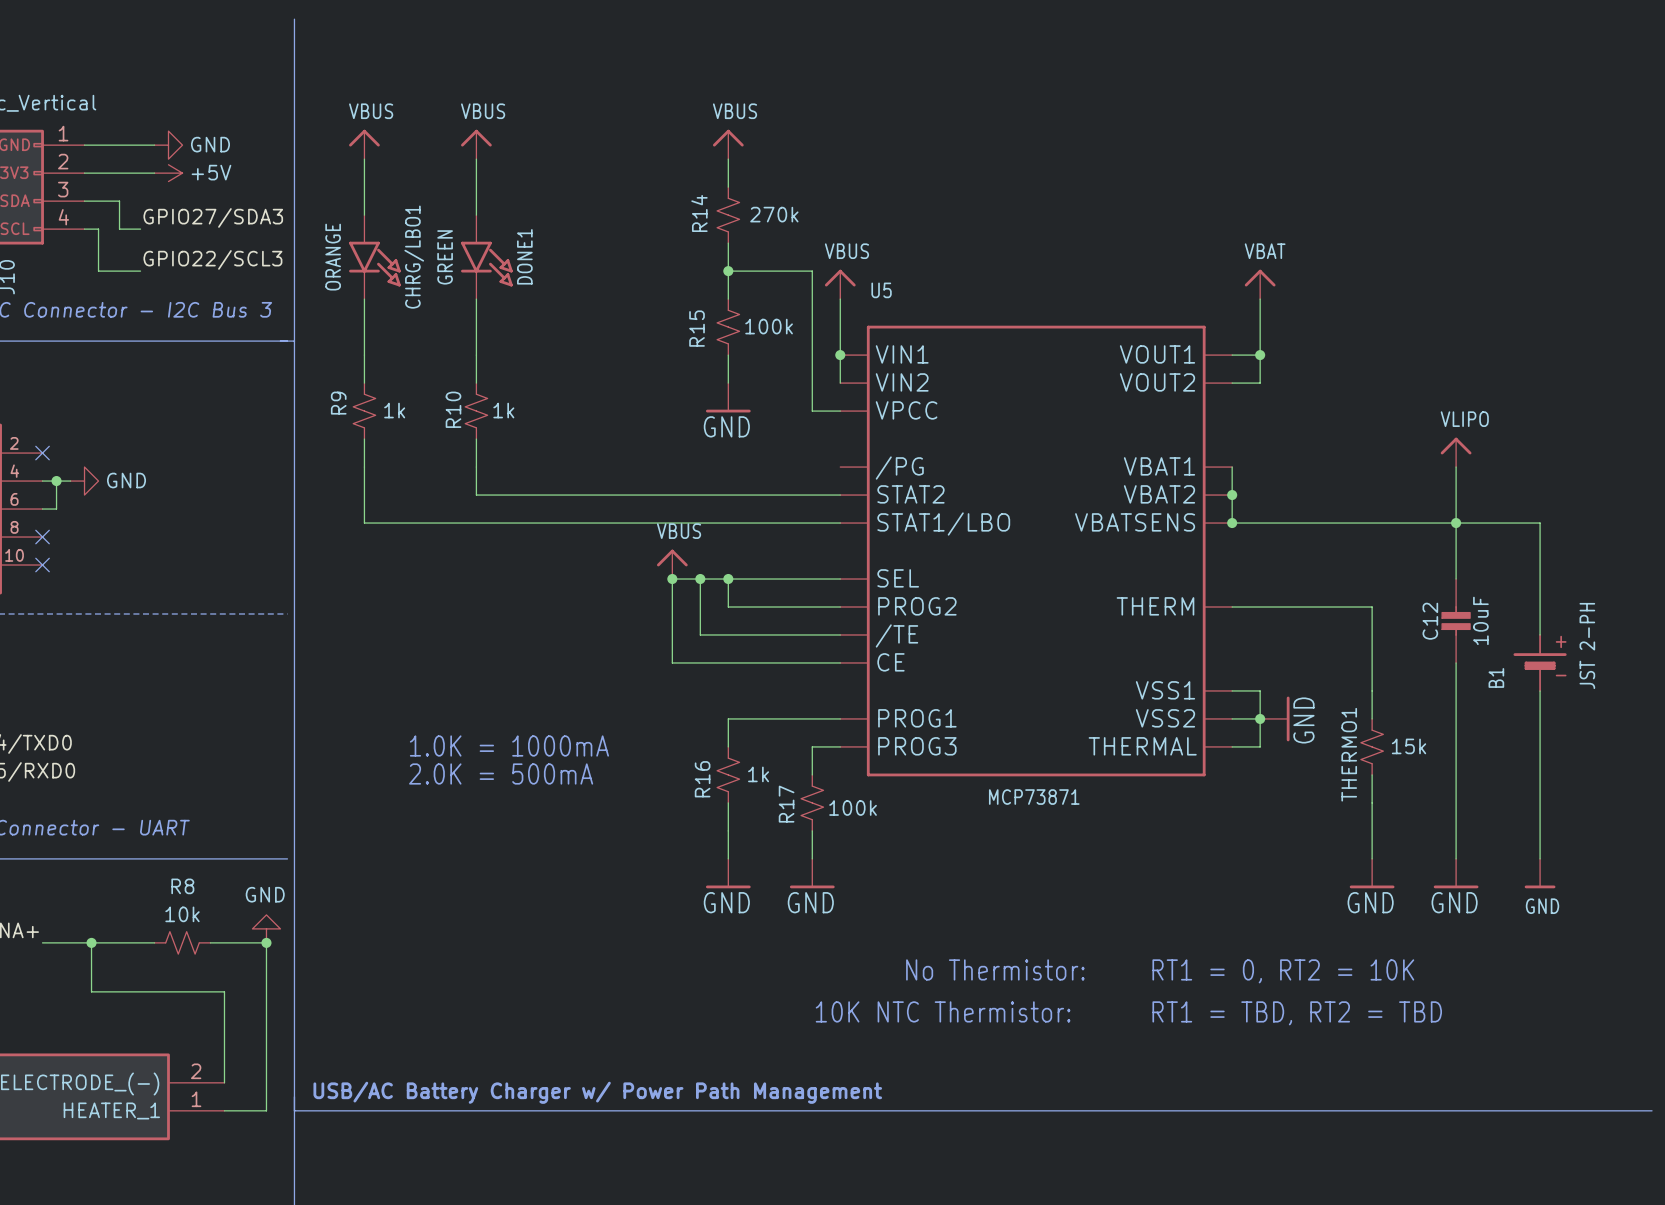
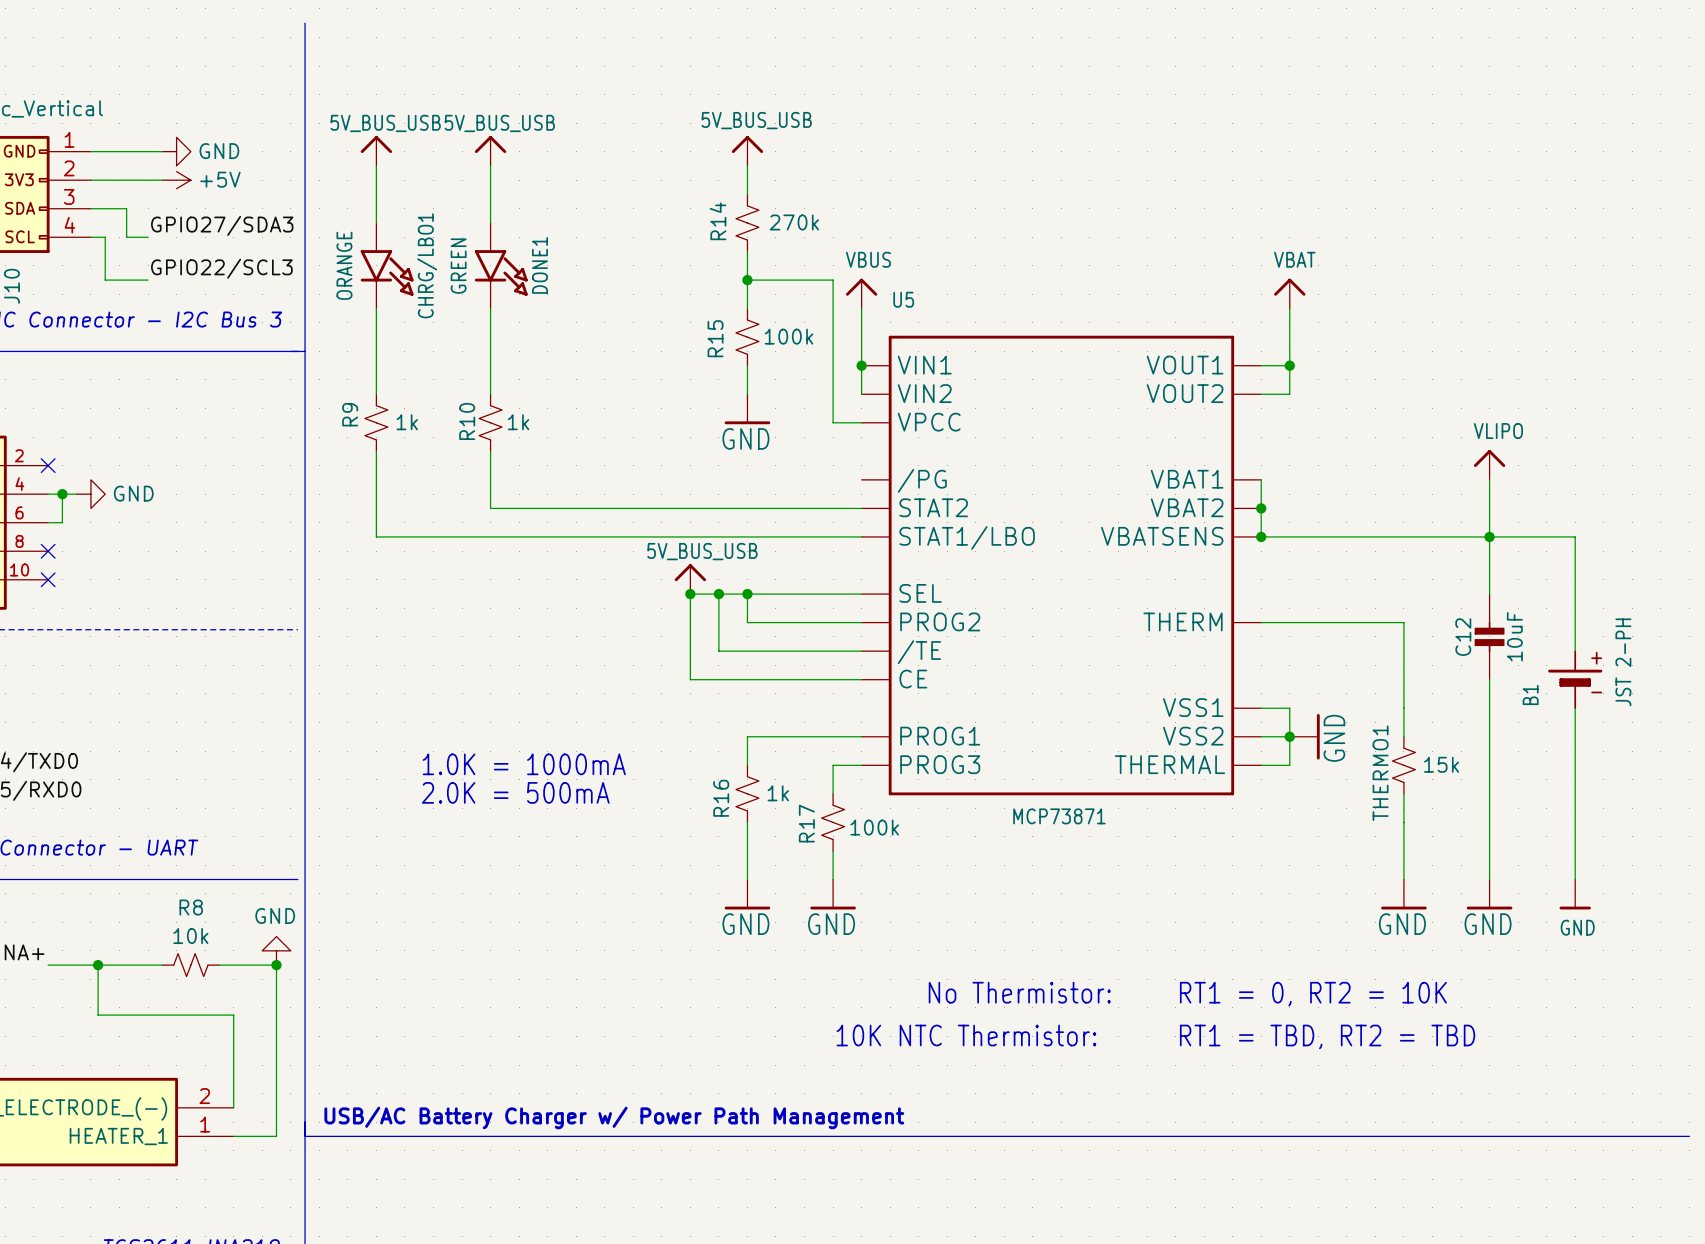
power symbol: VBUS (364, 144) -> 5V_BUS_USB (376, 150)
power symbol: VBUS (476, 144) -> 5V_BUS_USB (490, 150)
power symbol: VBUS (728, 144) -> 5V_BUS_USB (747, 150)
power symbol: VBUS (672, 564) -> 5V_BUS_USB (690, 579)

